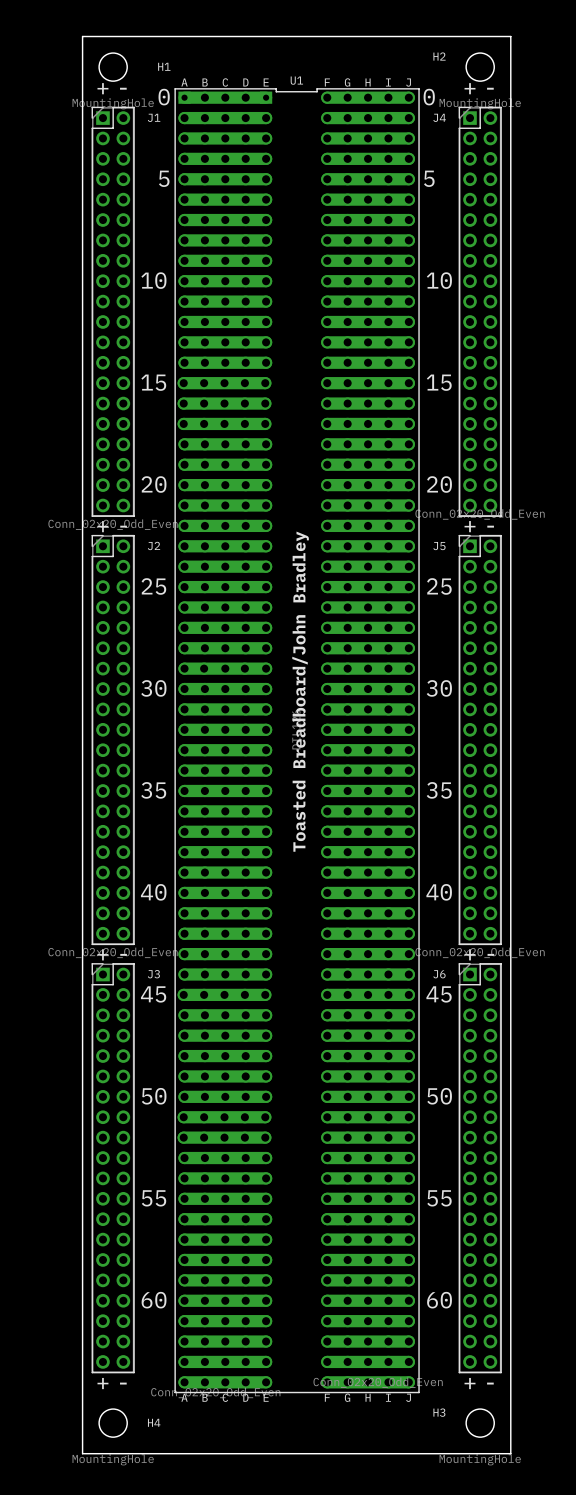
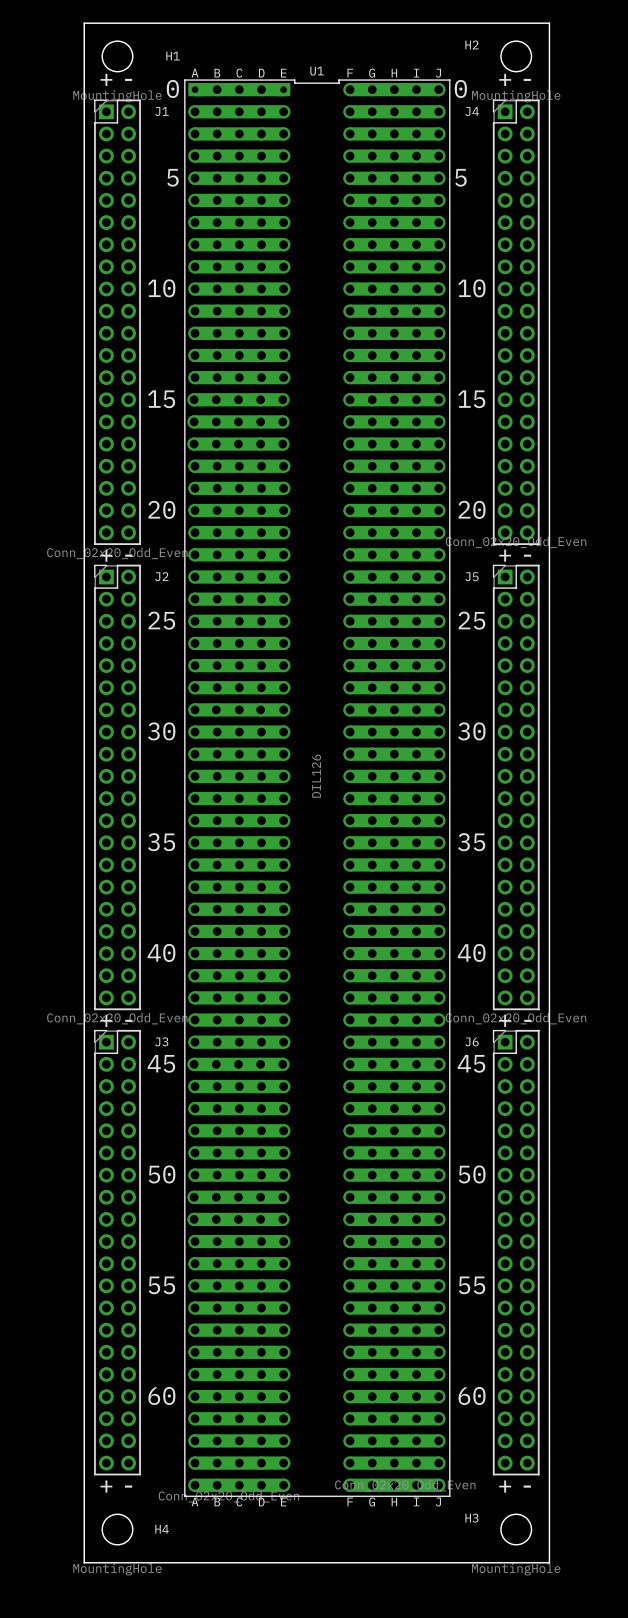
text: Toasted Breadboard/John Bradley (300, 691) -> none

